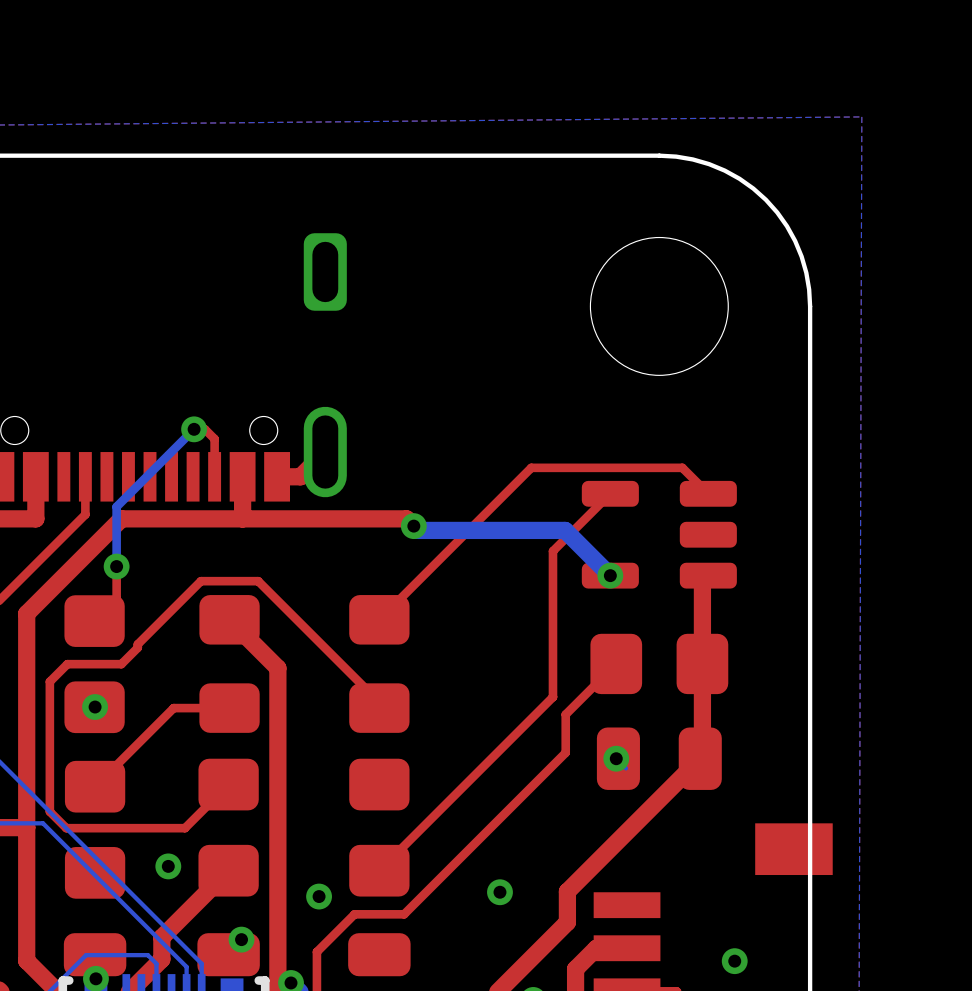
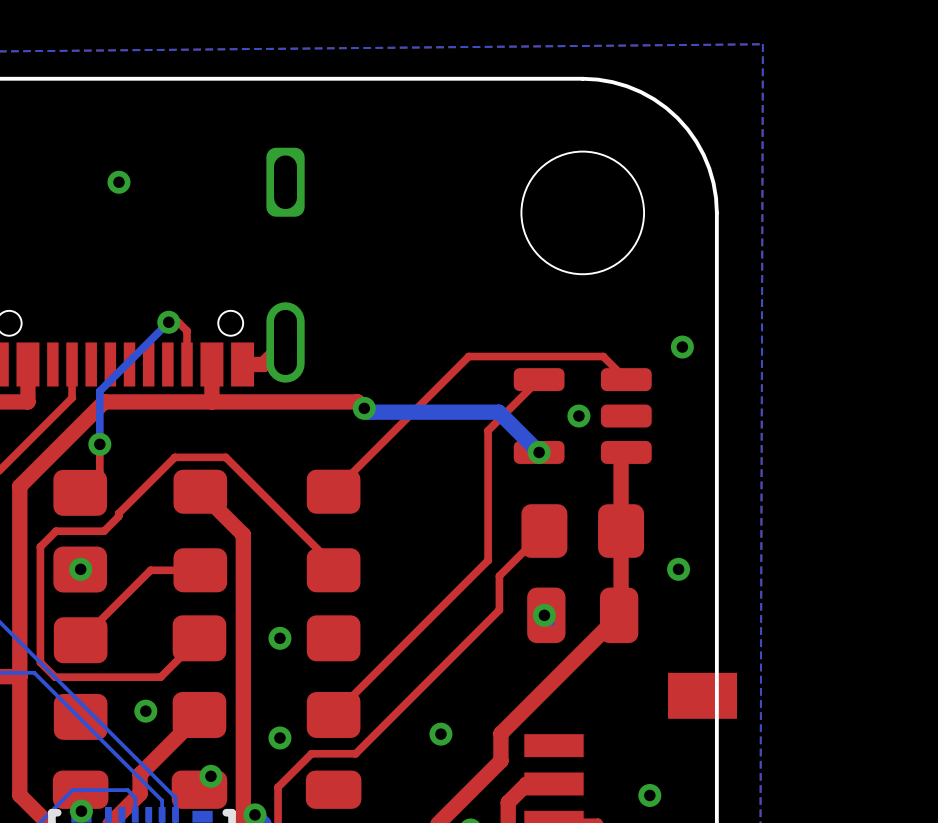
via: none -> (118, 182)
via: none -> (682, 347)
via: none -> (578, 416)
via: none -> (678, 569)
via: none -> (279, 638)

